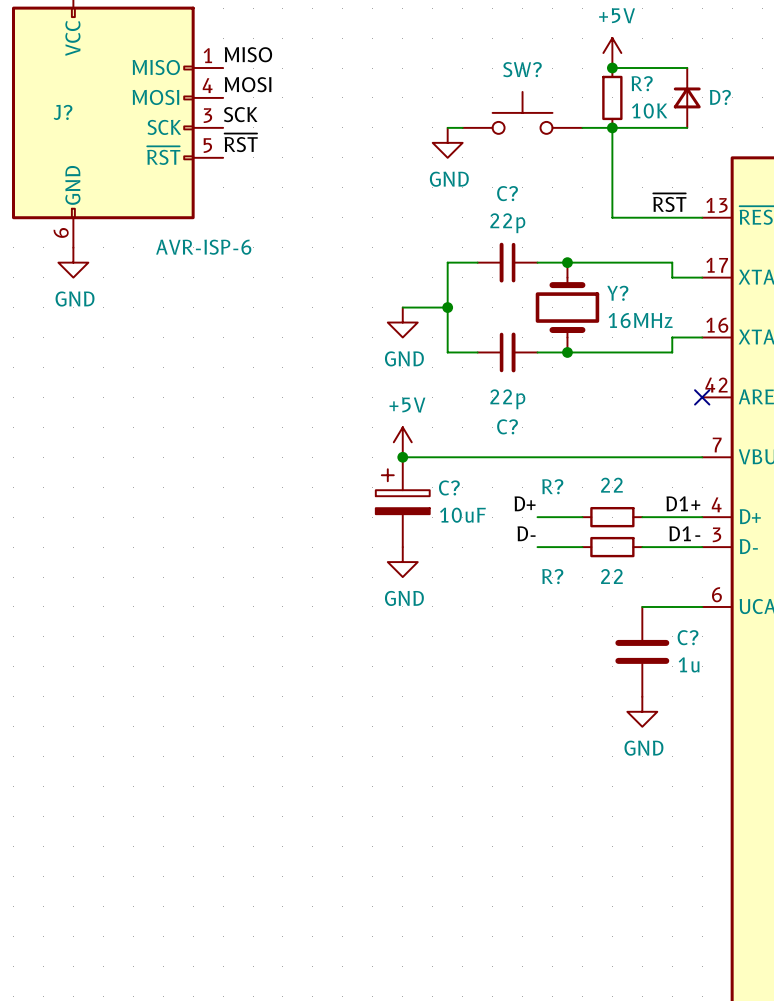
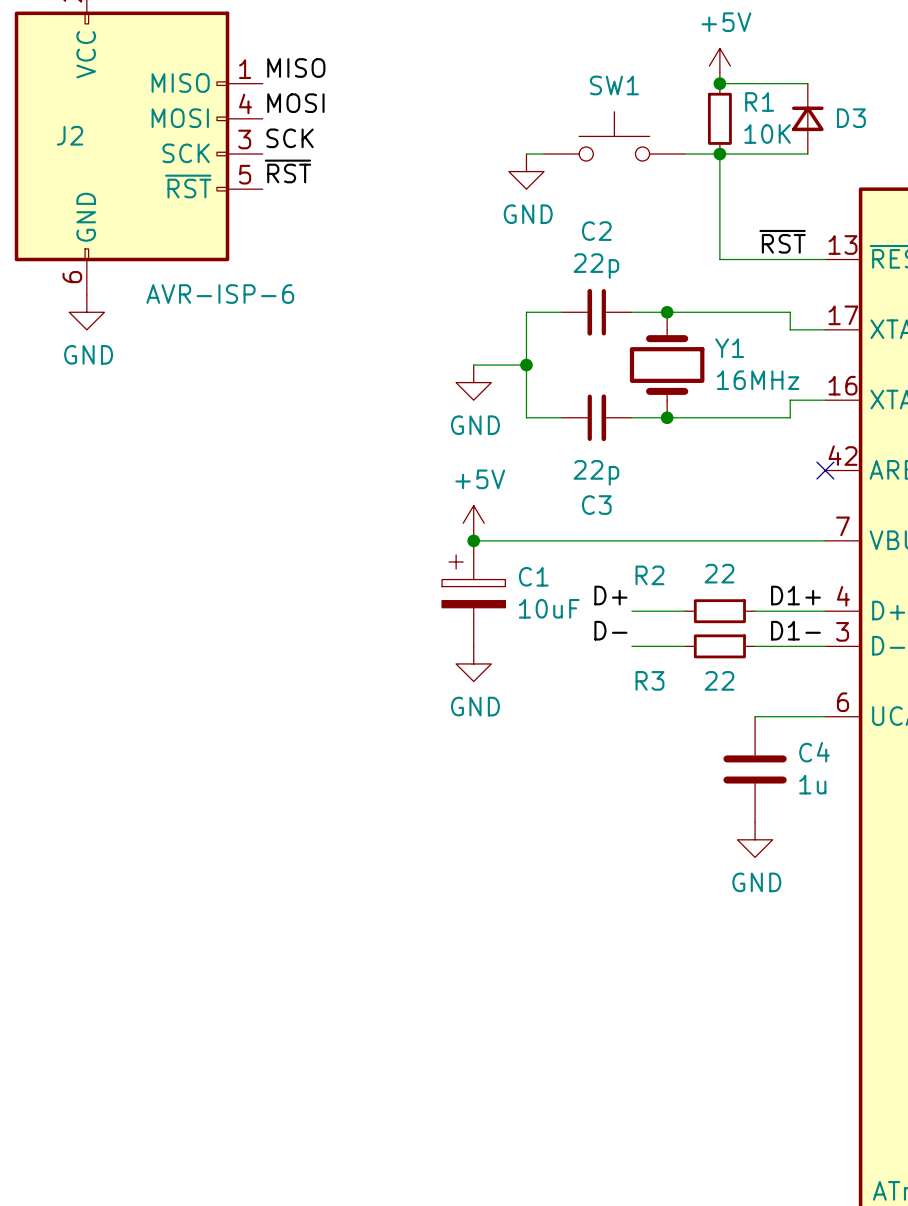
SW? name: SW? (522, 69) -> SW1 (614, 85)
R? name: R? (642, 83) -> R1 (759, 102)
D? name: D? (720, 97) -> D3 (851, 118)
J? name: J? (63, 112) -> J2 (69, 135)
C? name: C? (507, 193) -> C2 (596, 231)
Y? name: Y? (617, 293) -> Y1 (729, 348)
C? name: C? (507, 426) -> C3 (596, 505)
R? name: R? (552, 486) -> R2 (649, 575)
C? name: C? (449, 487) -> C1 (533, 576)
R? name: R? (552, 576) -> R3 (649, 680)
C? name: C? (688, 637) -> C4 (814, 752)

